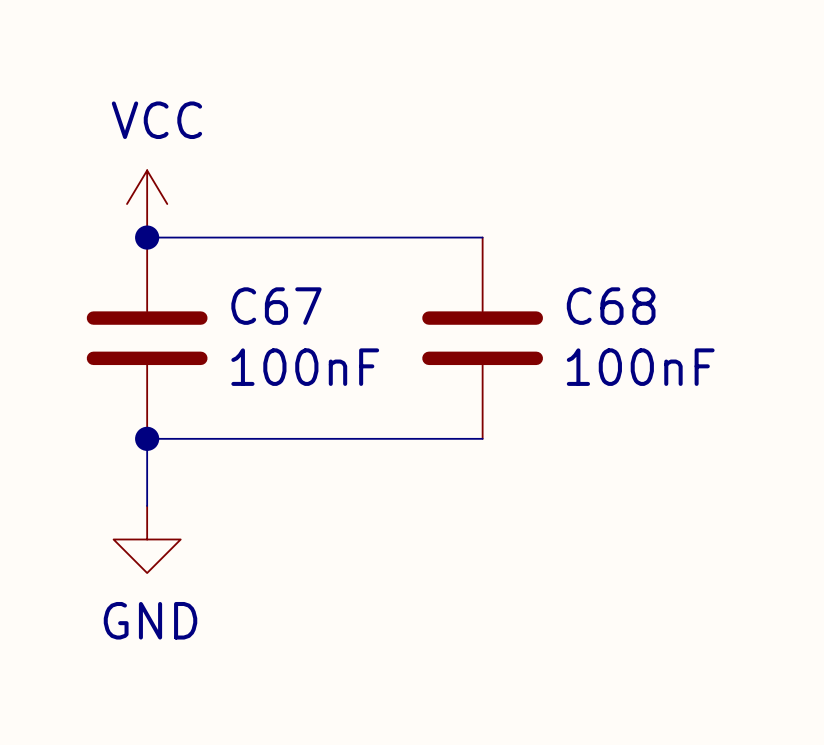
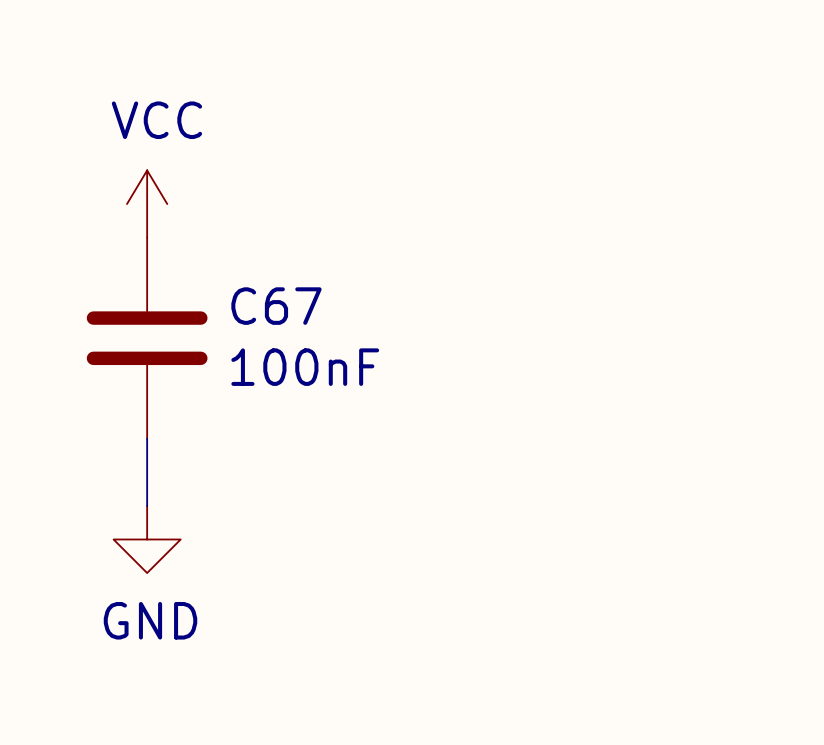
wire: (147, 237) (482, 237) -> none
junction: (147, 237) -> none
C68: 100nF (482, 338) -> none
wire: (147, 438) (482, 438) -> none
junction: (147, 438) -> none

